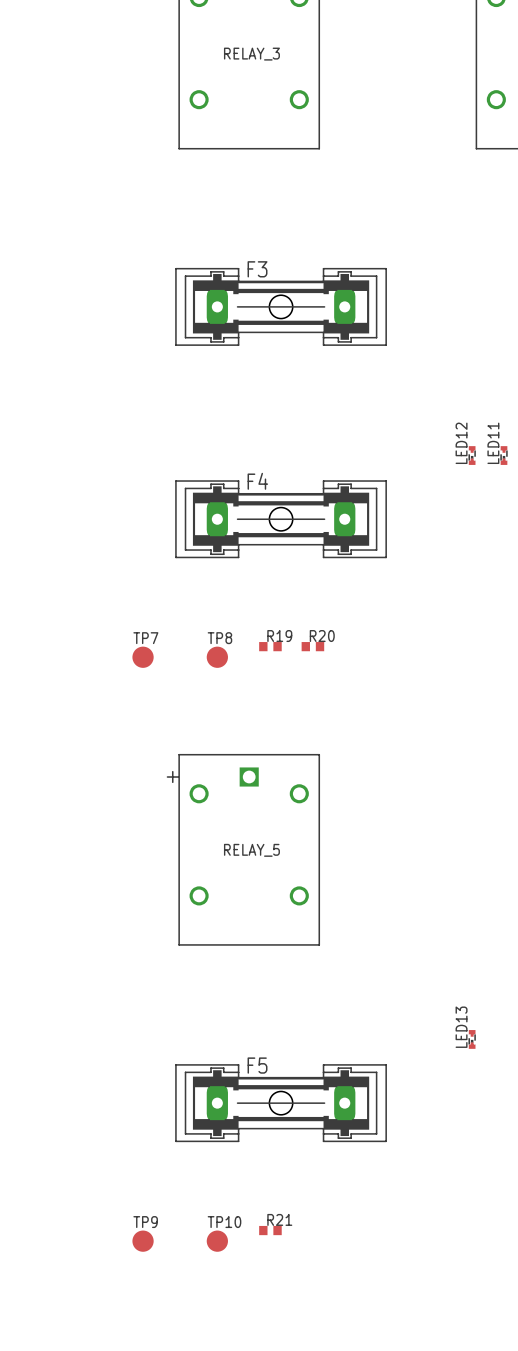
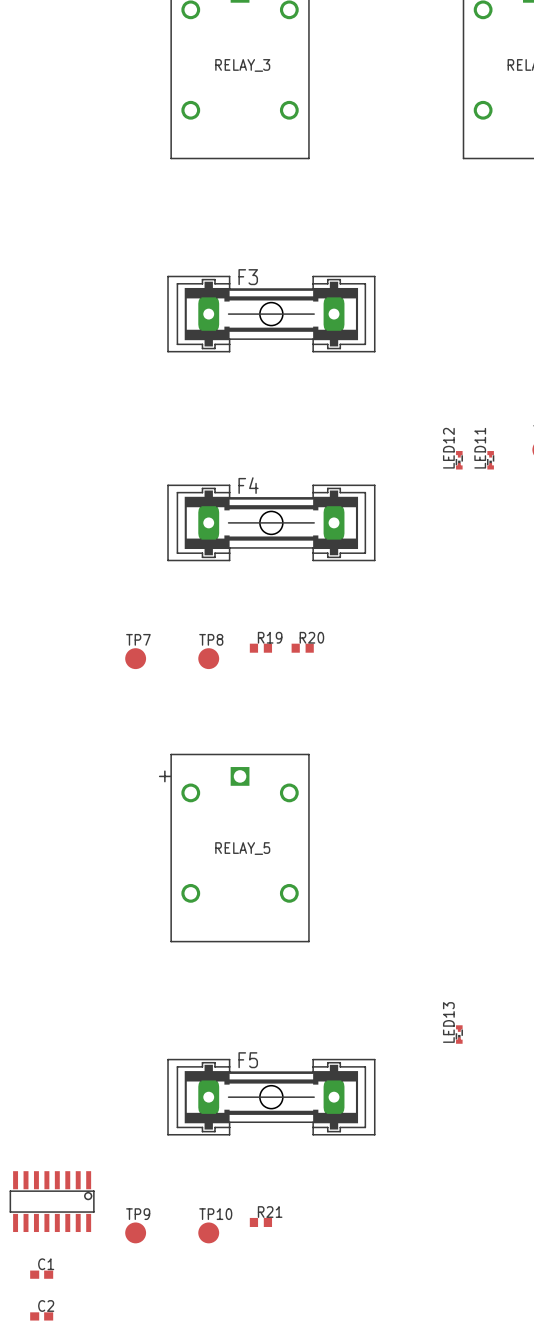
part: none -> (52, 1201)
C1: none -> (41, 1274)
C2: none -> (41, 1316)

